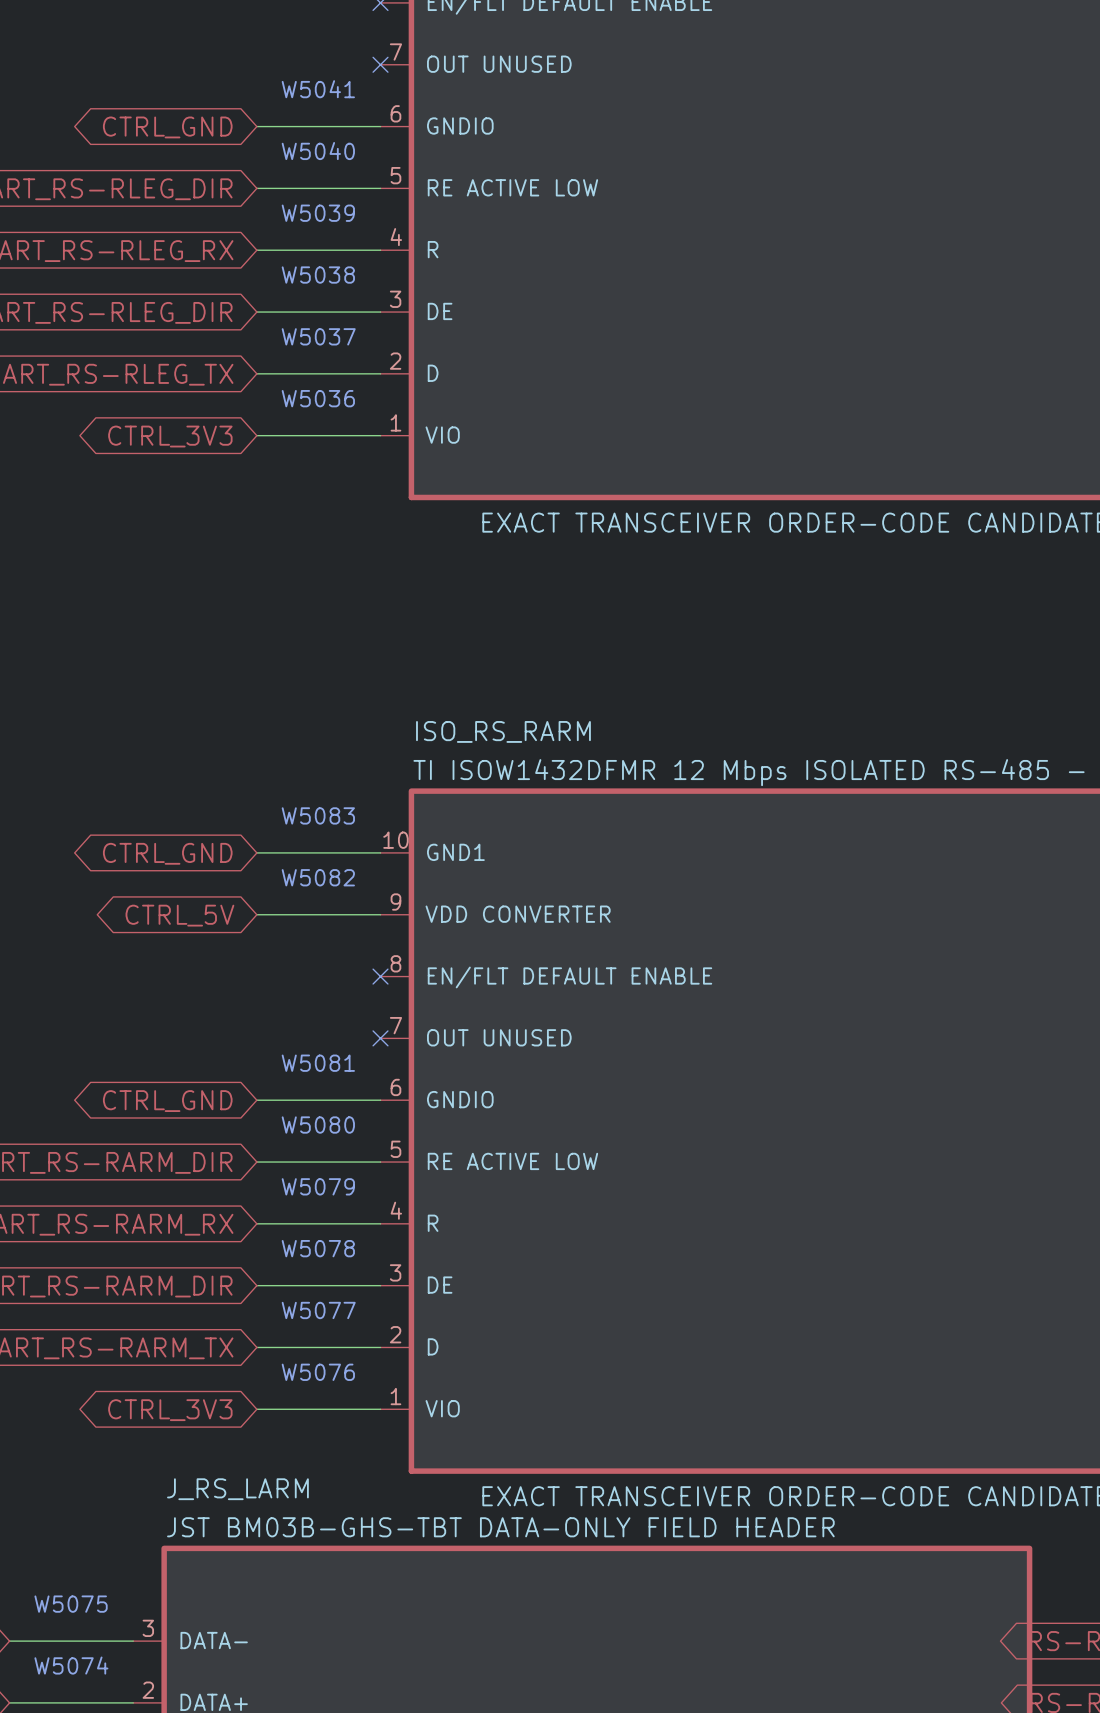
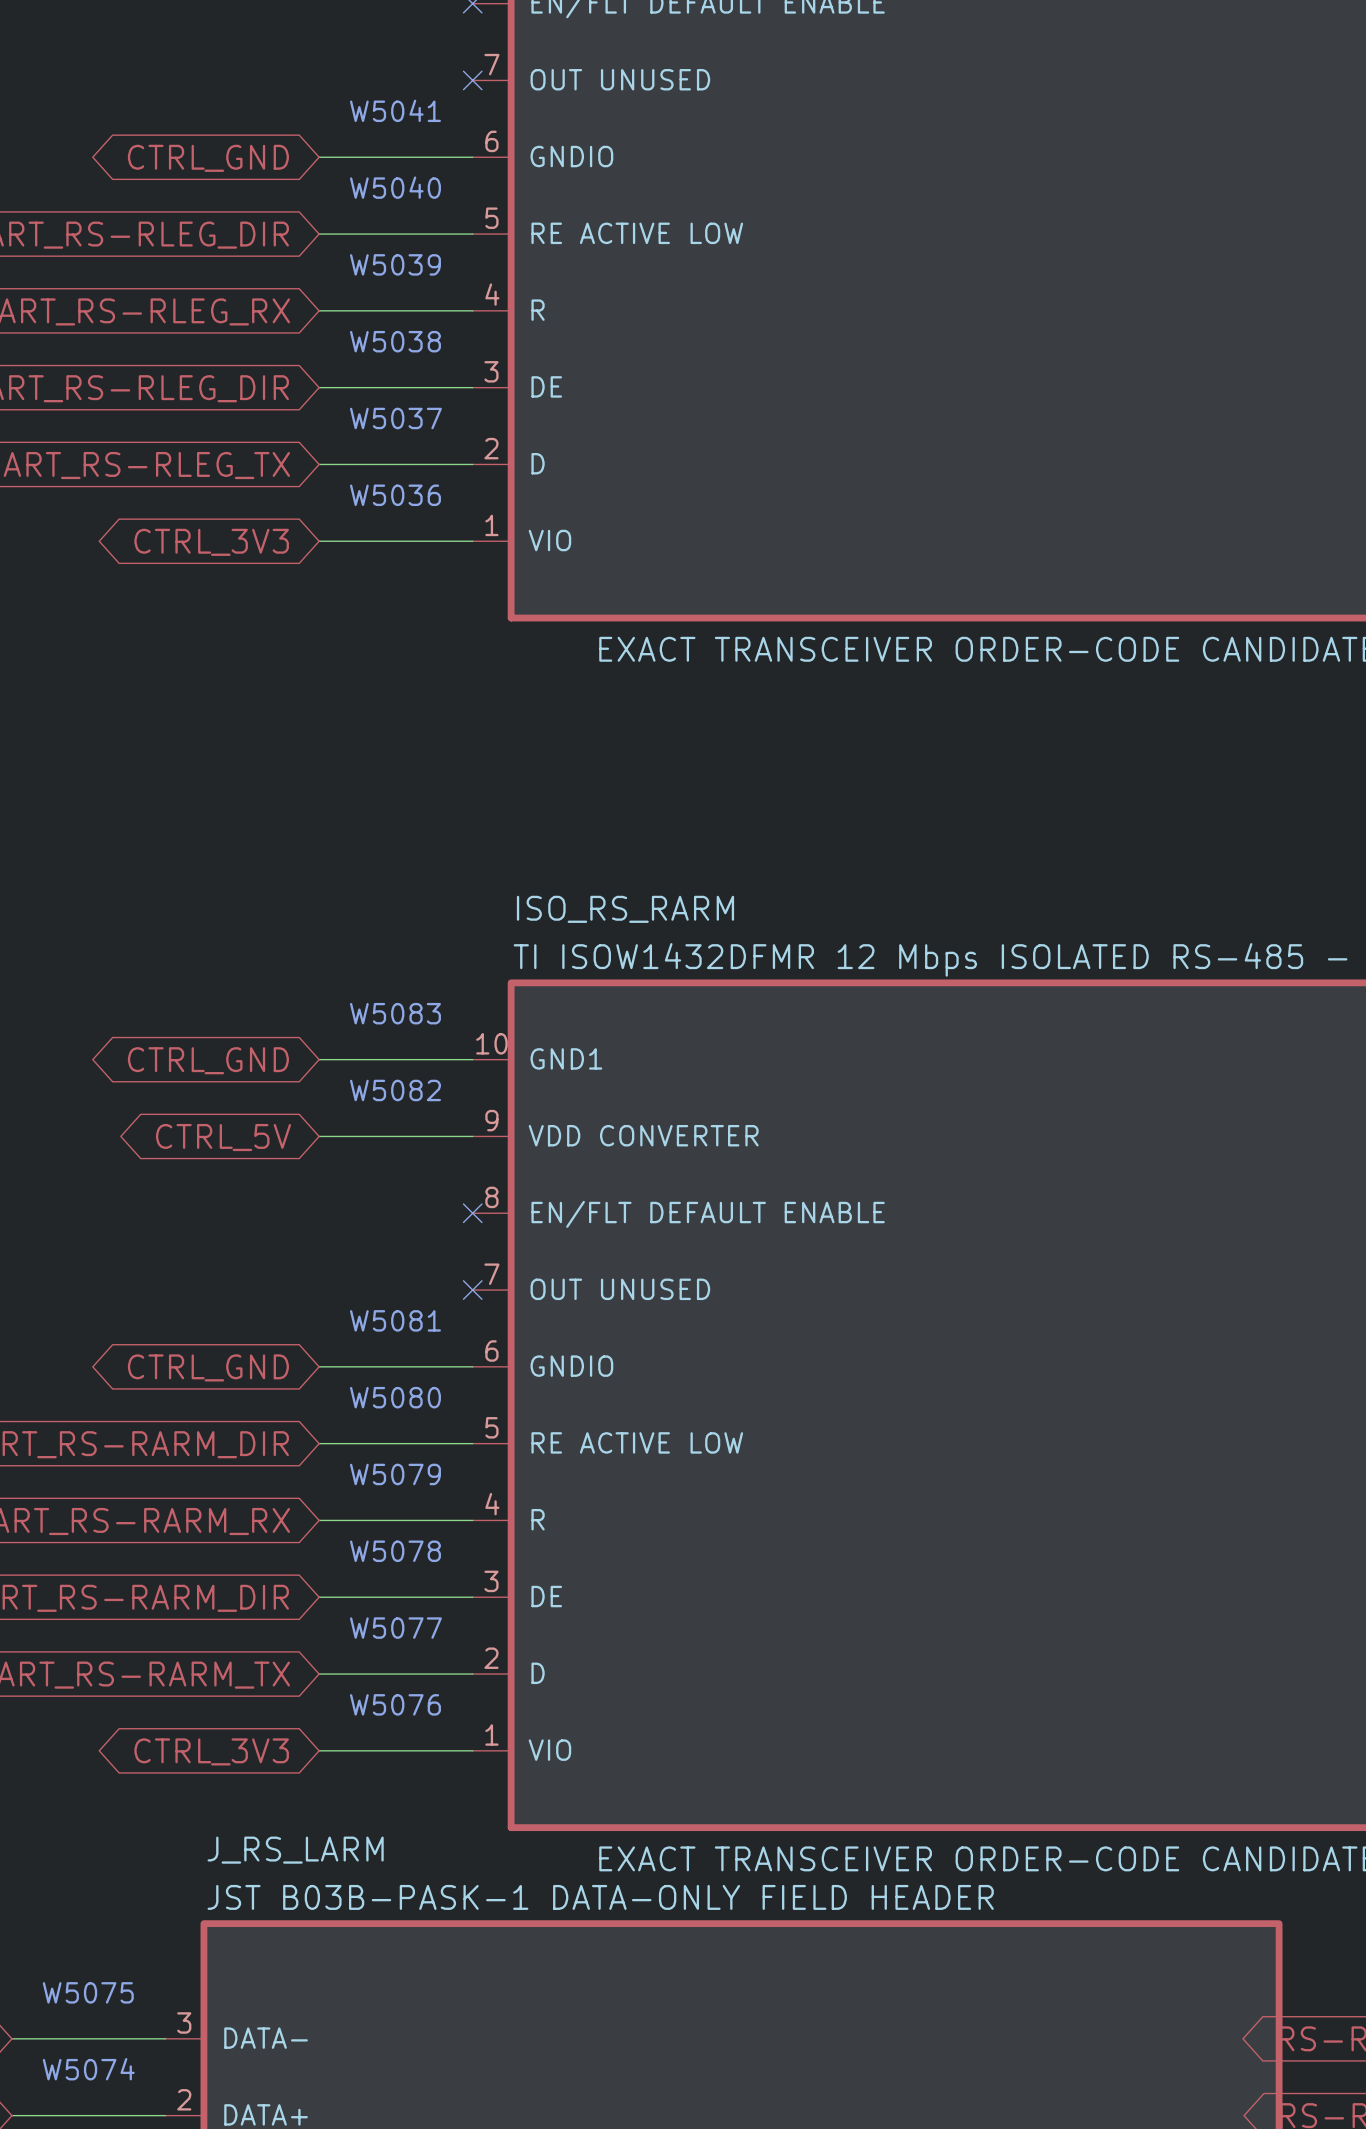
J_RS_LARM text: JST BM03B-GHS-TBT DATA-ONLY FIELD HEADER (500, 1527) -> JST B03B-PASK-1 DATA-ONLY FIELD HEADER (600, 1897)

